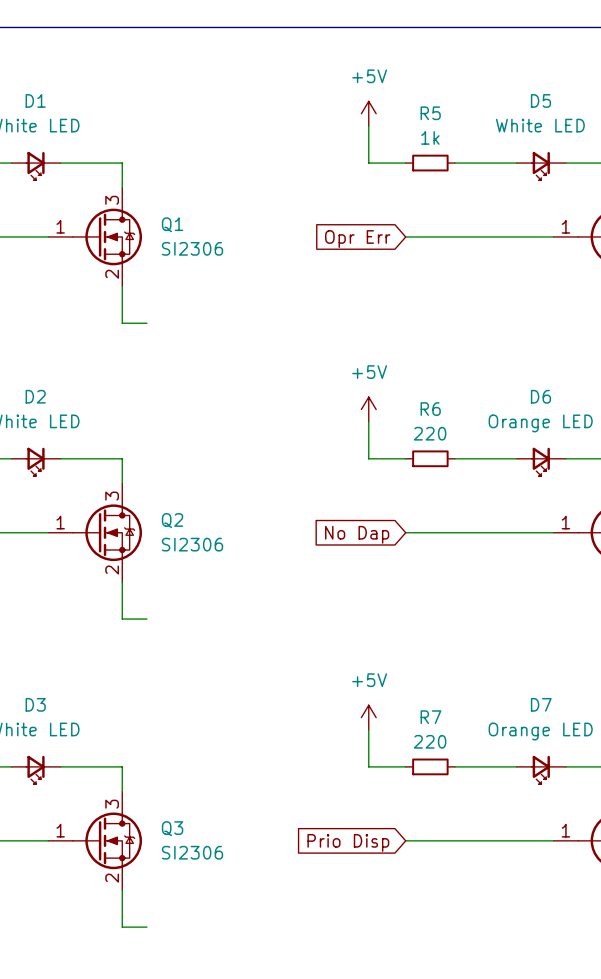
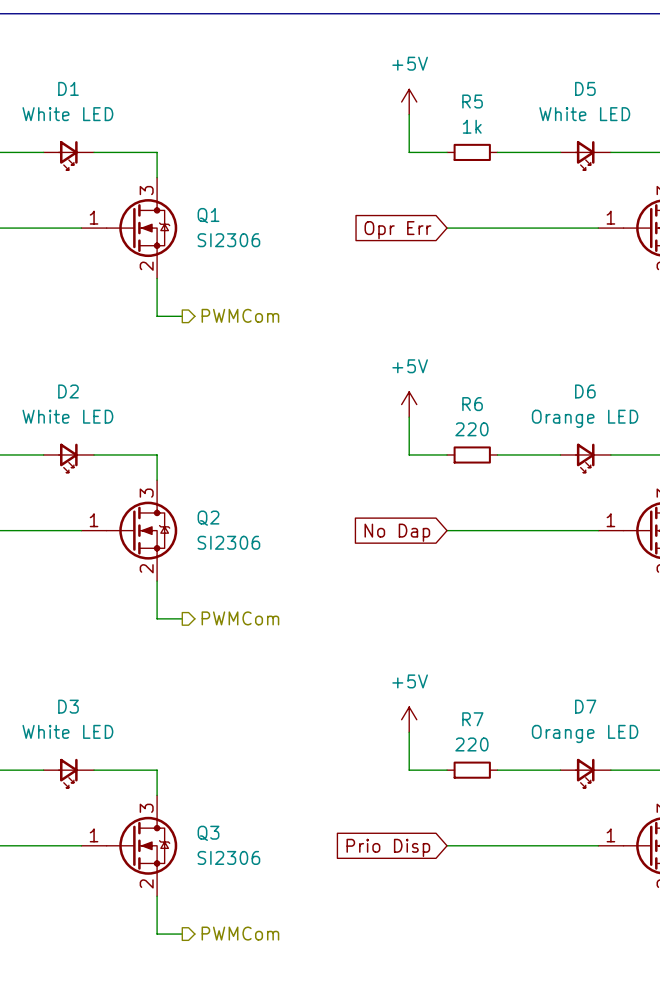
hierarchical label: none -> PWMCom (240, 315)
hierarchical label: none -> PWMCom (240, 618)
hierarchical label: none -> PWMCom (240, 933)

